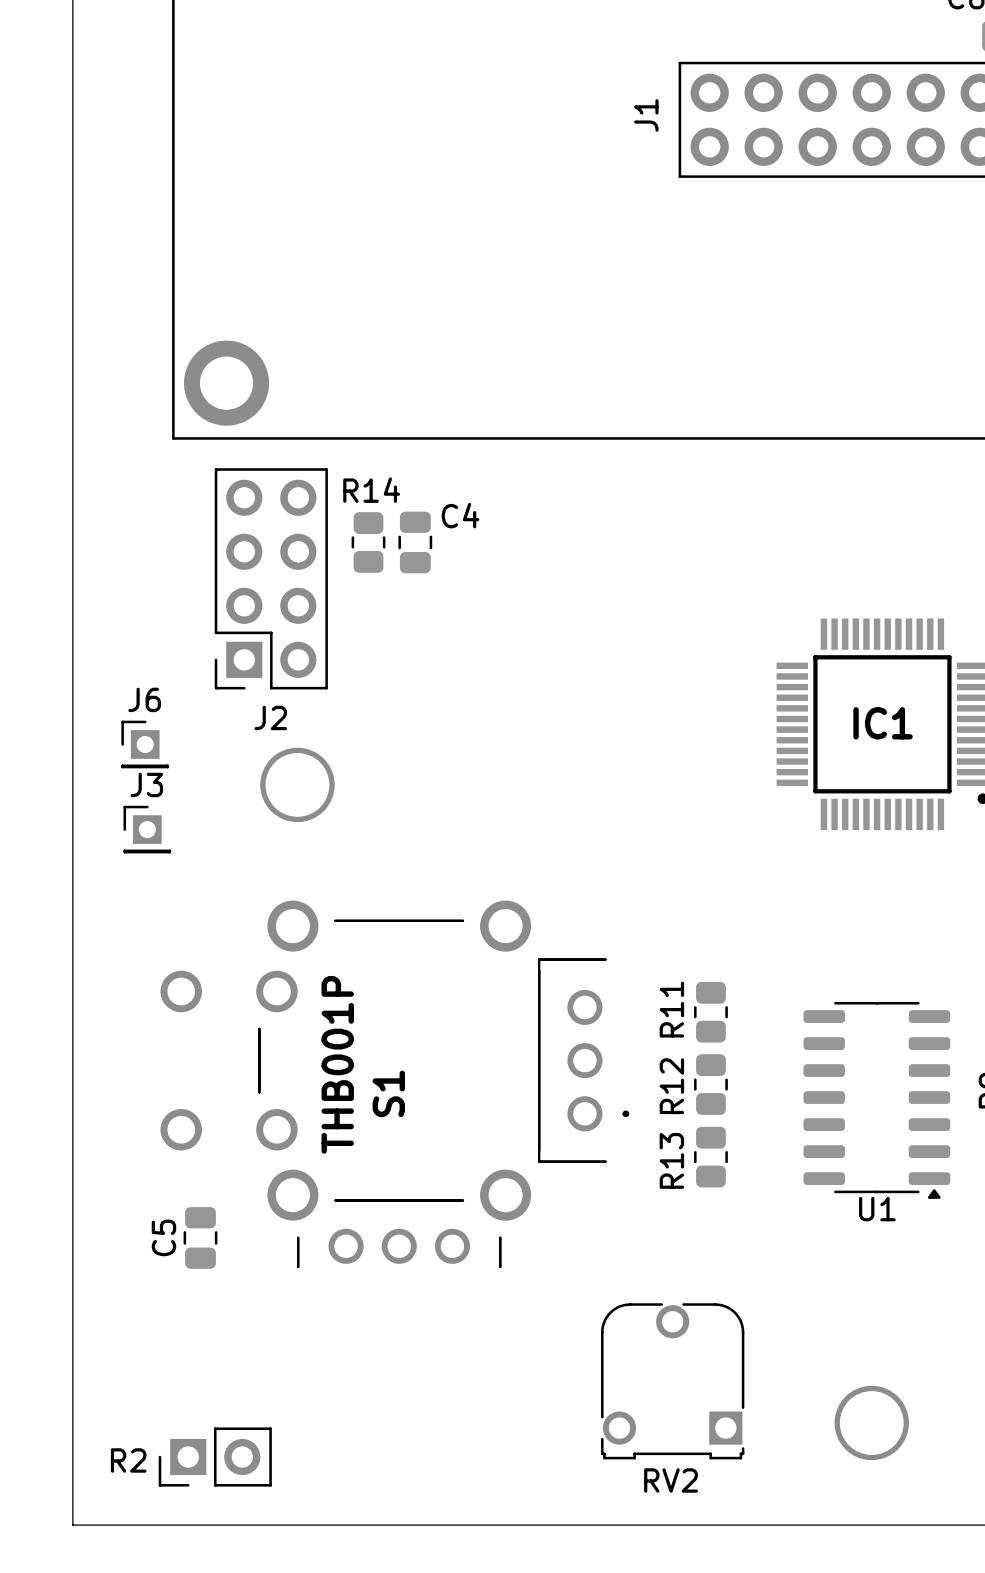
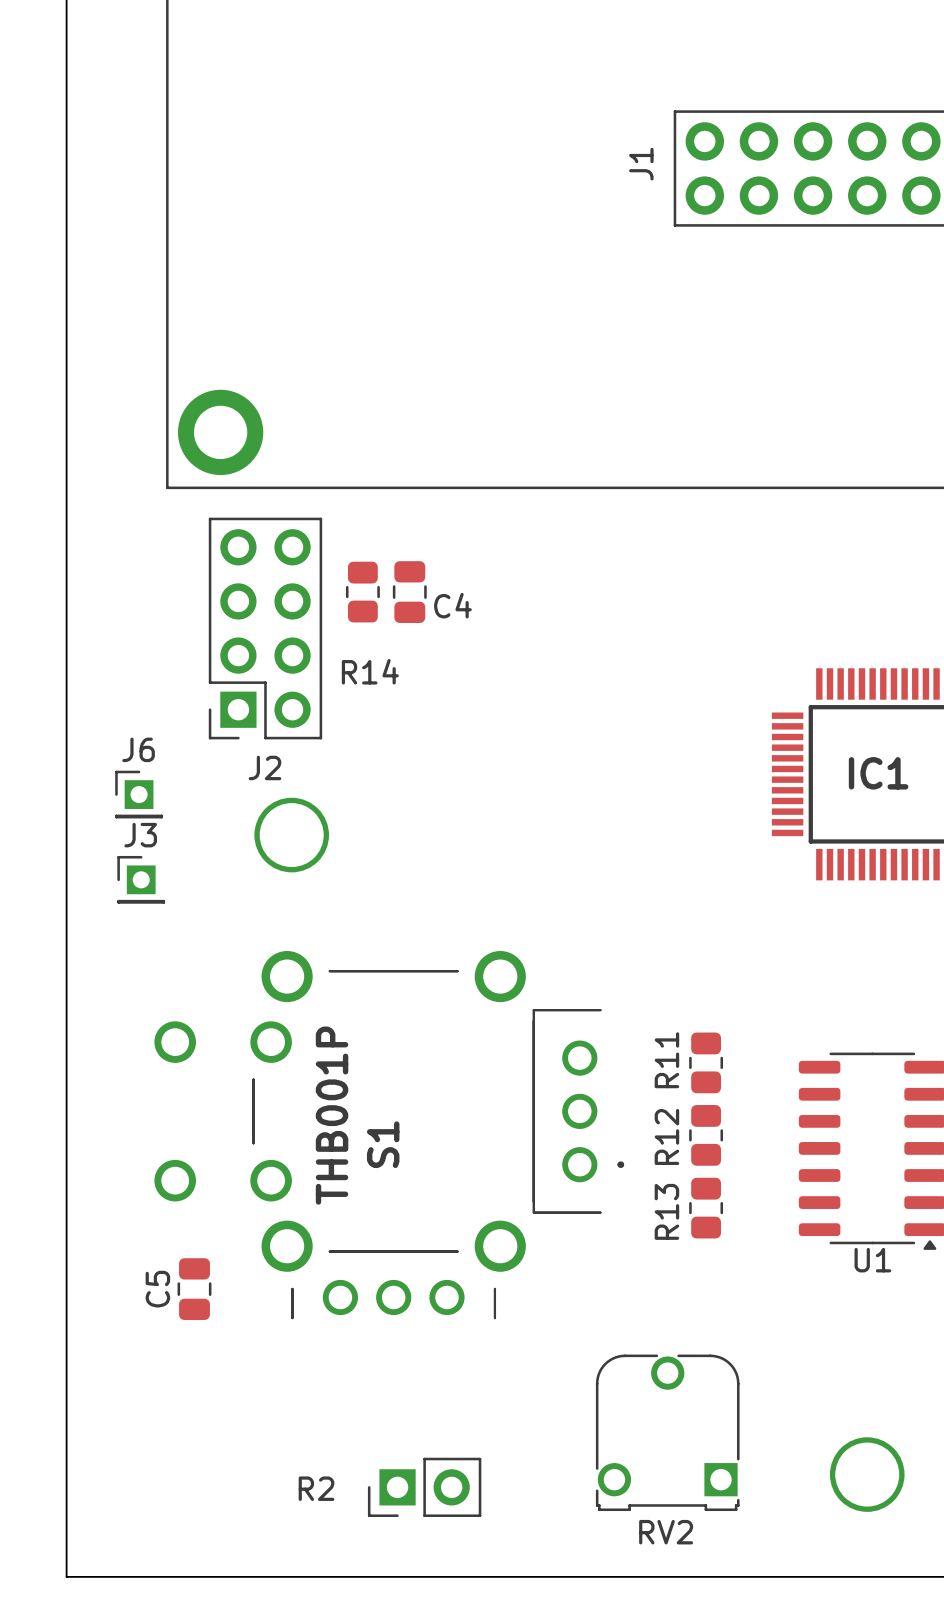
R14 name position: R14 (371, 490) -> R14 (370, 671)
C4 name position: C4 (460, 515) -> C4 (452, 605)
R2 position: (215, 1457) -> (424, 1487)
R2 name position: R2 (128, 1460) -> R2 (316, 1488)

